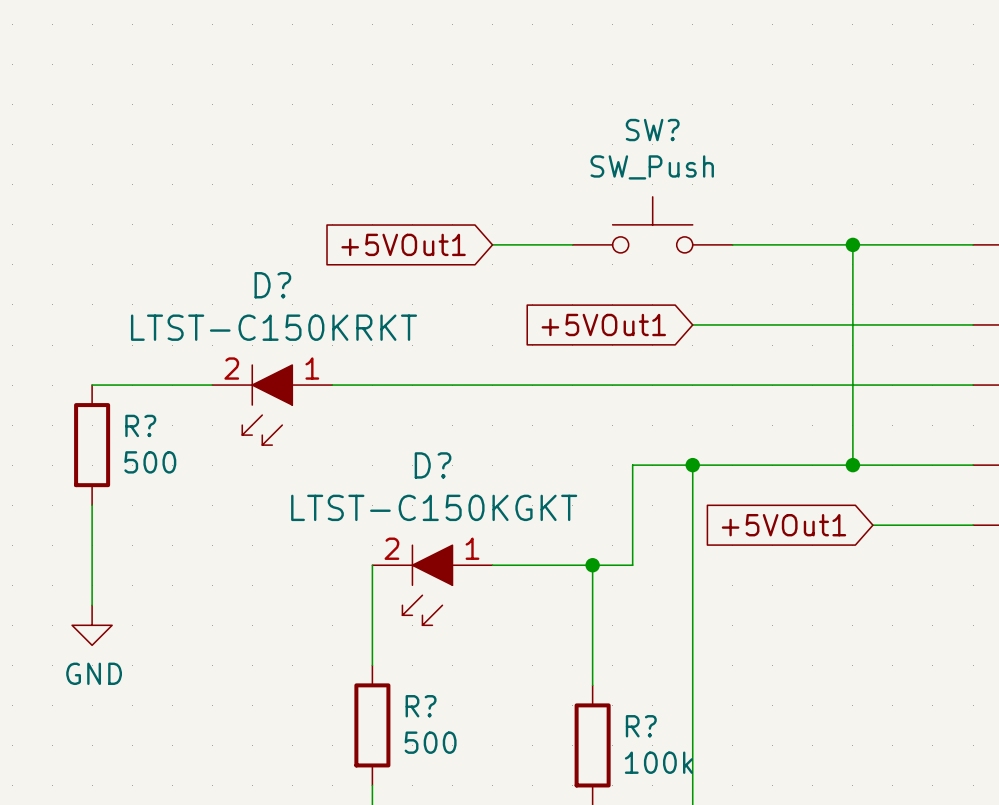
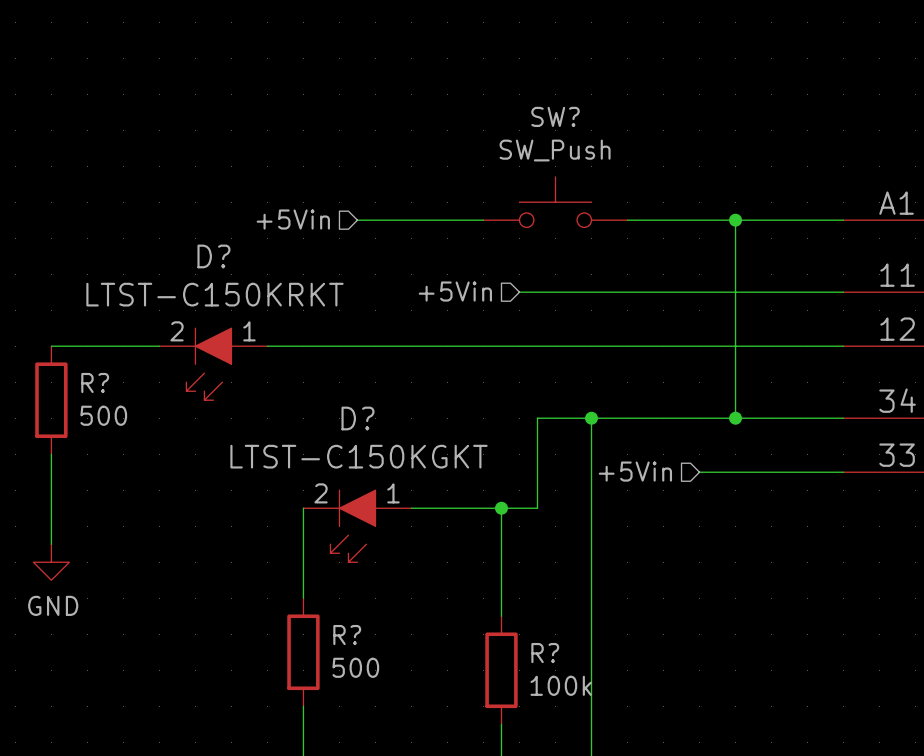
hierarchical label: none -> +5Vin (293, 219)
global label: +5VOut1 (403, 244) -> none
wire: none -> (357, 220) (411, 220)
hierarchical label: none -> +5Vin (455, 291)
global label: +5VOut1 (603, 324) -> none
wire: none -> (519, 292) (591, 292)
hierarchical label: none -> +5Vin (635, 471)
global label: +5VOut1 (783, 525) -> none
wire: none -> (699, 472) (753, 472)

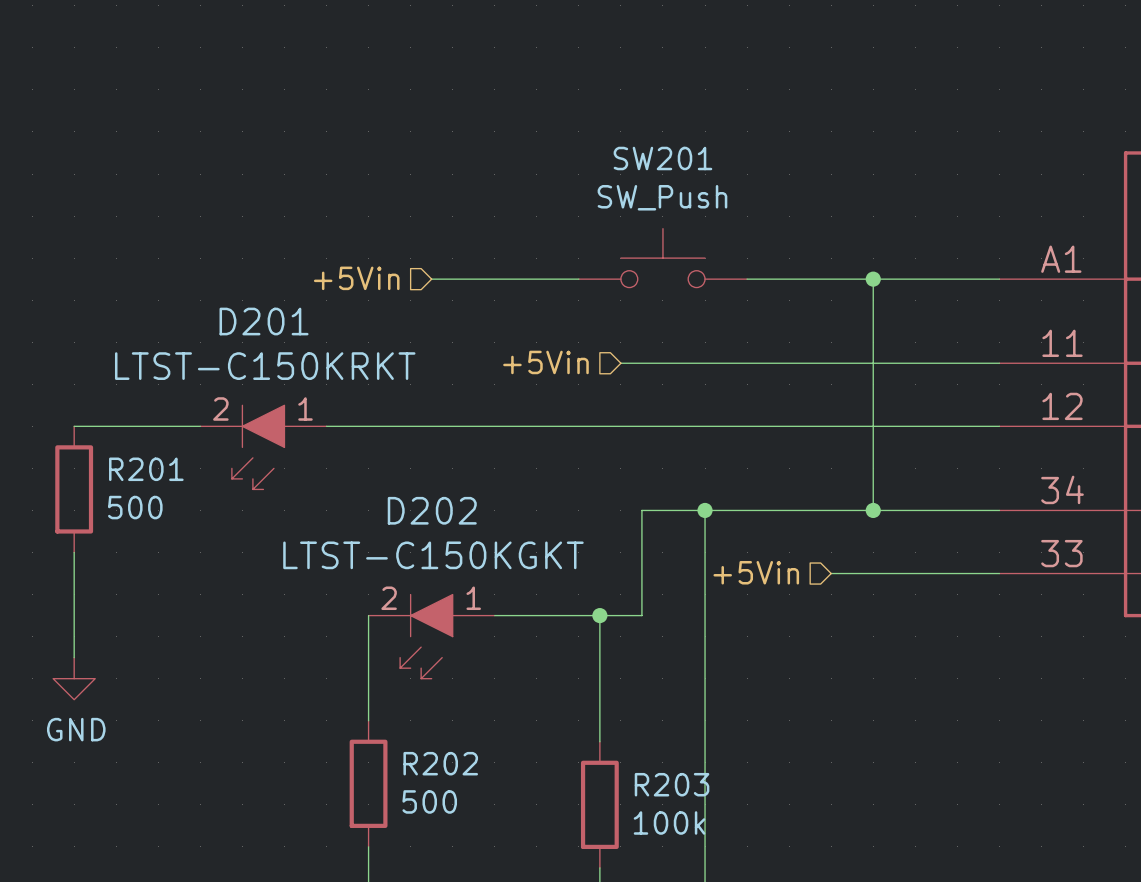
SW? name: SW? (555, 116) -> SW201 (662, 158)
D? name: D? (213, 256) -> D201 (264, 321)
R? name: R? (95, 382) -> R201 (146, 469)
D? name: D? (357, 418) -> D202 (432, 510)
R? name: R? (347, 635) -> R202 (440, 763)
R? name: R? (545, 653) -> R203 (672, 784)

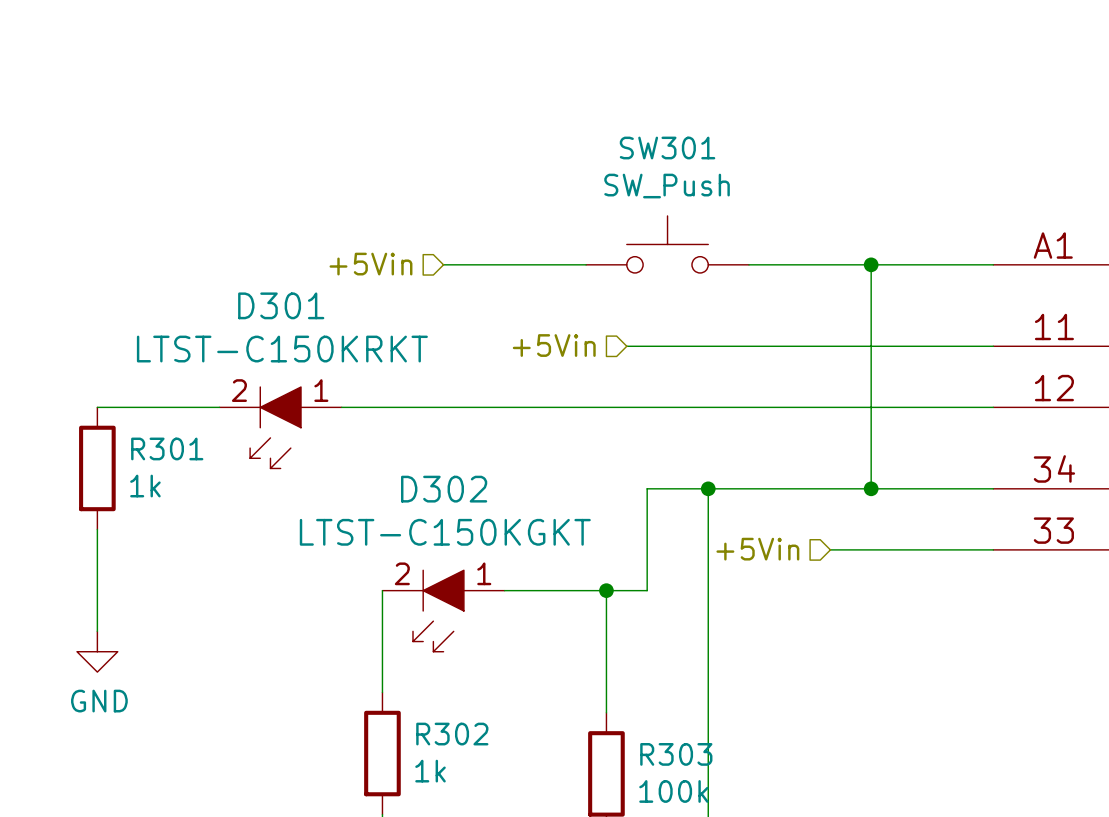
SW201 name: SW201 (662, 158) -> SW301 (667, 148)
D201 name: D201 (264, 321) -> D301 (281, 305)
R201 name: R201 (146, 469) -> R301 (167, 448)
R201 value: 500 (135, 507) -> 1k (145, 486)
D202 name: D202 (432, 510) -> D302 (444, 489)
R202 name: R202 (440, 763) -> R302 (452, 734)
R203 name: R203 (672, 784) -> R303 (676, 754)
R202 value: 500 (429, 801) -> 1k (430, 771)

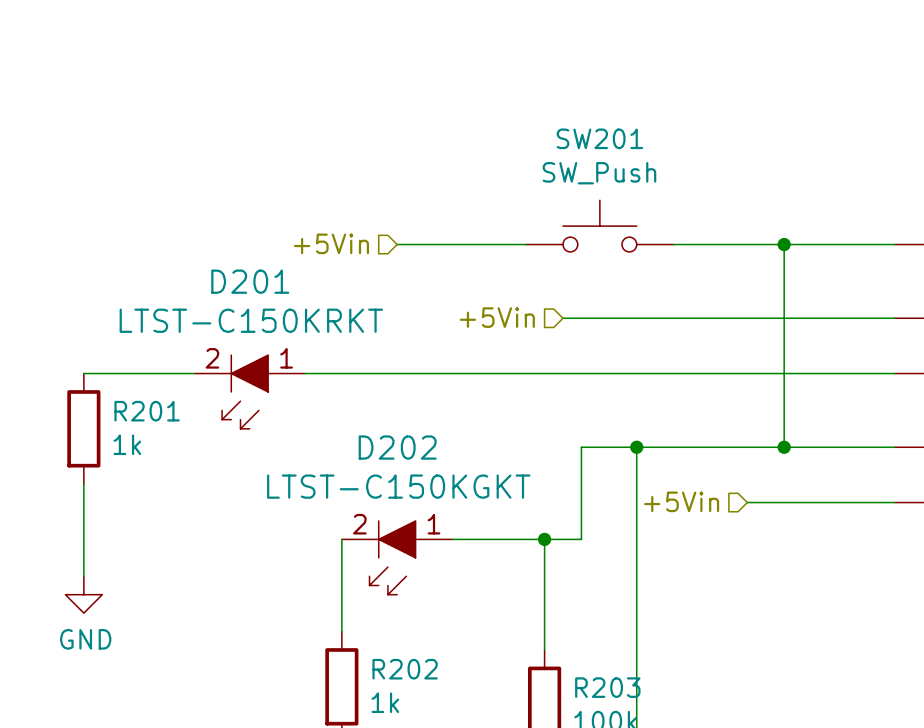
SW301 name: SW301 (667, 148) -> SW201 (599, 138)
D301 name: D301 (281, 305) -> D201 (250, 281)
R301 name: R301 (167, 448) -> R201 (147, 411)
D302 name: D302 (444, 489) -> D202 (397, 447)
R302 name: R302 (452, 734) -> R202 (405, 669)
R303 name: R303 (676, 754) -> R203 (607, 687)

